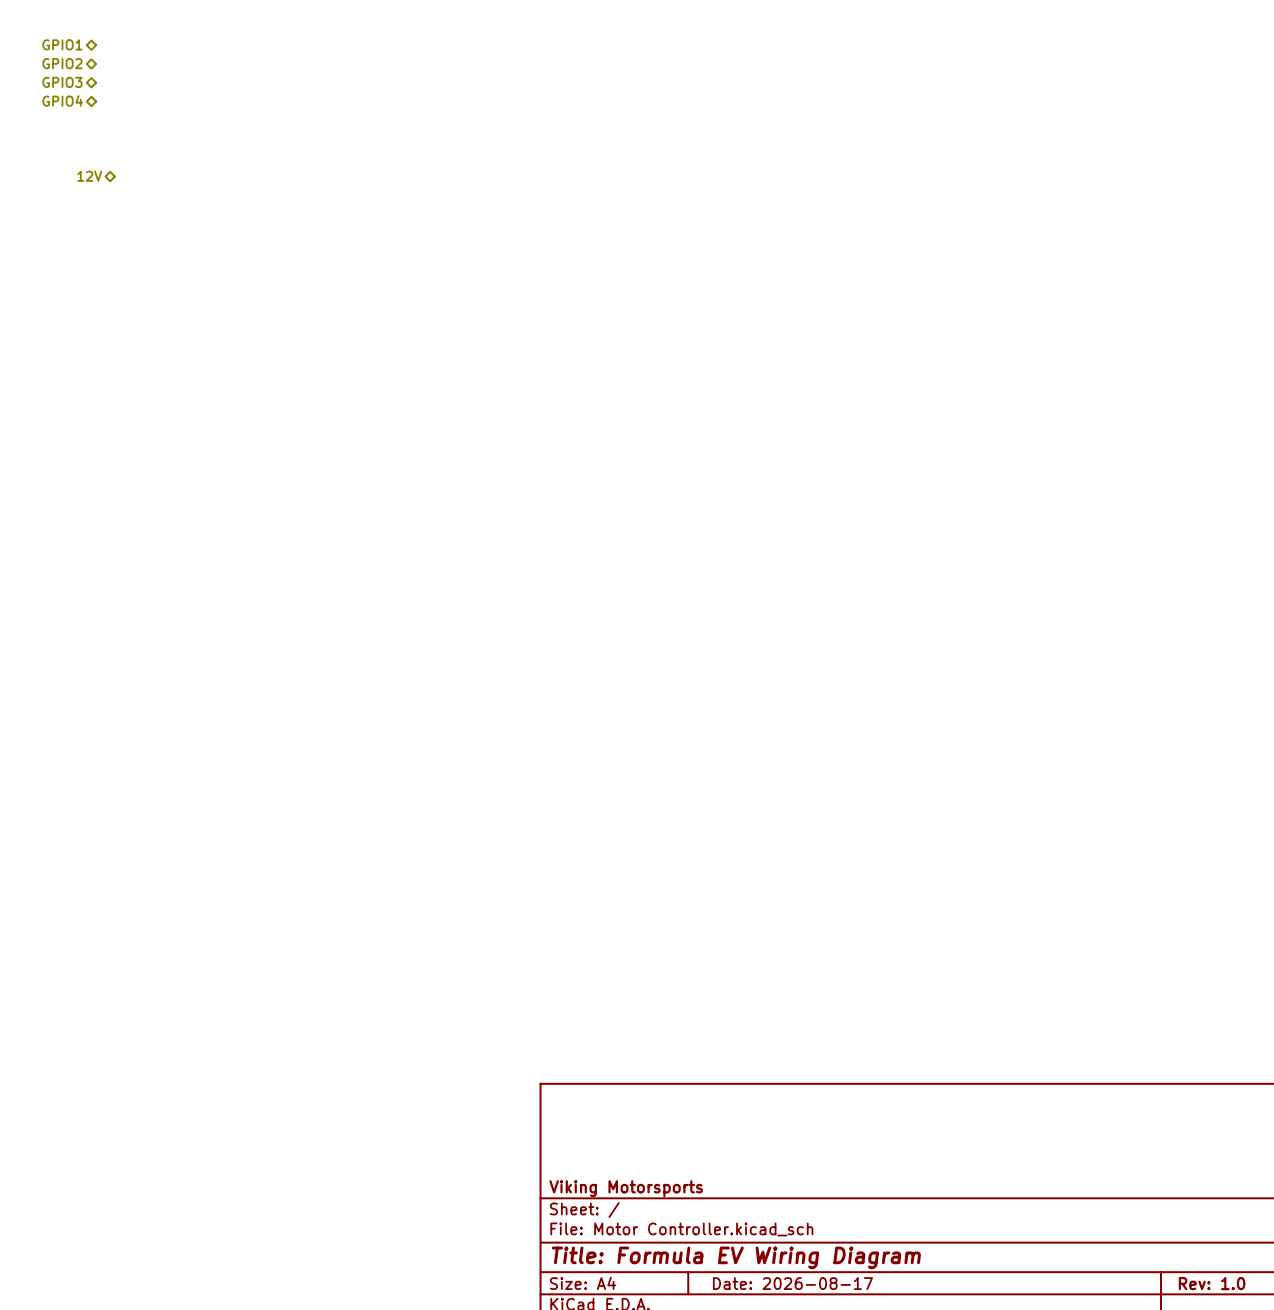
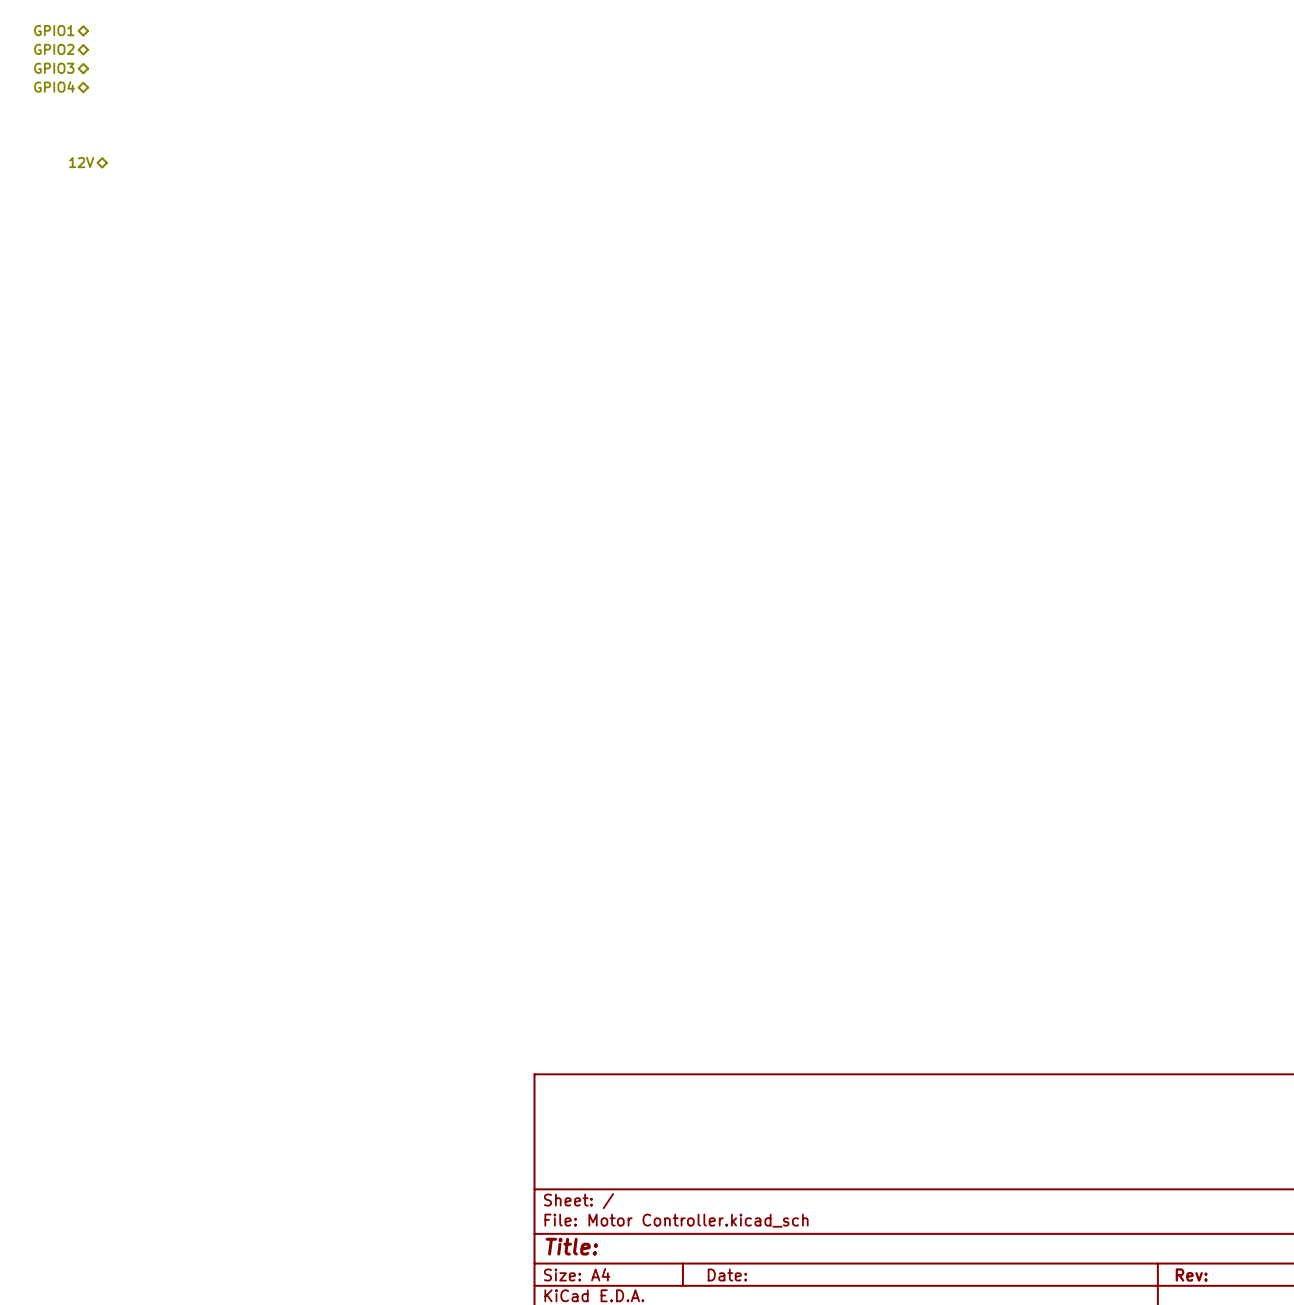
title block: Viking Motorsports (626, 1188) -> none
title block: Title: Formula EV Wiring Diagram (736, 1257) -> Title: (571, 1246)
title block: Date: 2026-08-17 (792, 1283) -> Date: (727, 1275)
title block: Rev: 1.0 (1212, 1283) -> Rev: (1191, 1275)

